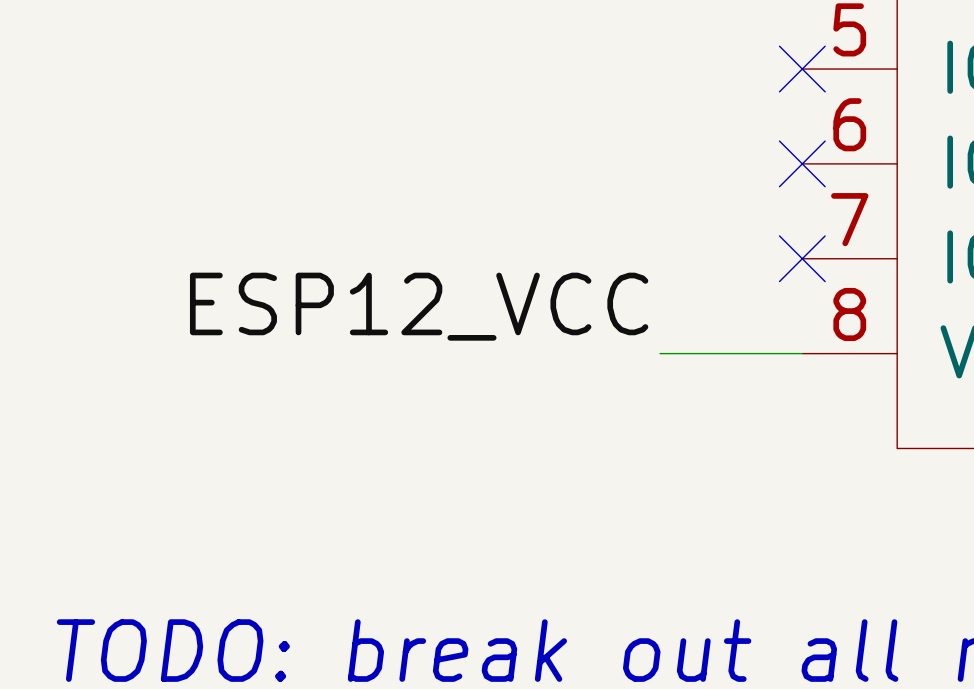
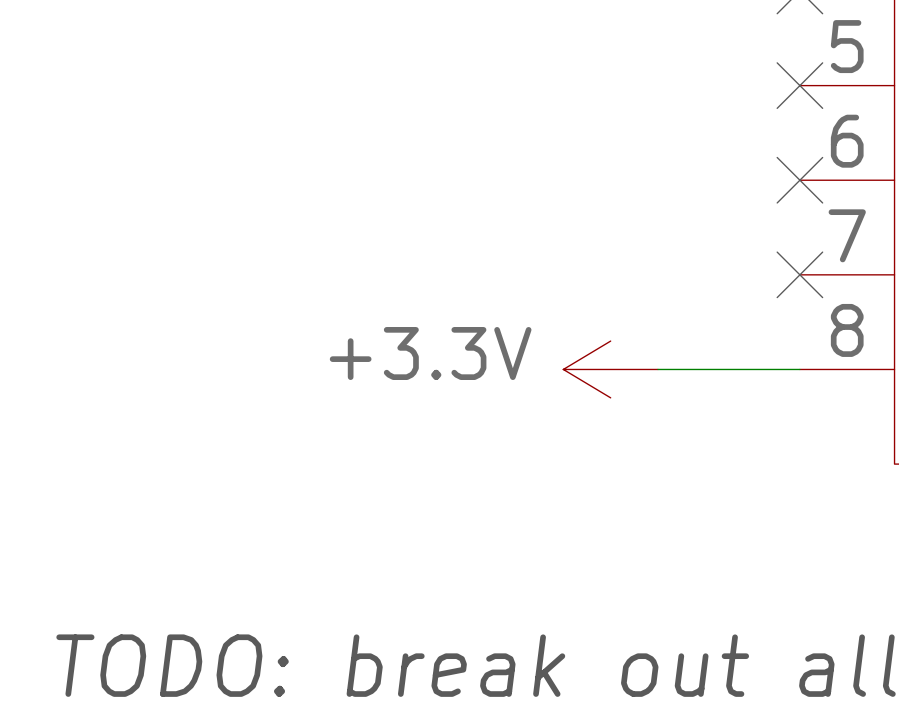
label: ESP12_VCC (419, 306) -> none
power symbol: none -> +3.3V (610, 369)

